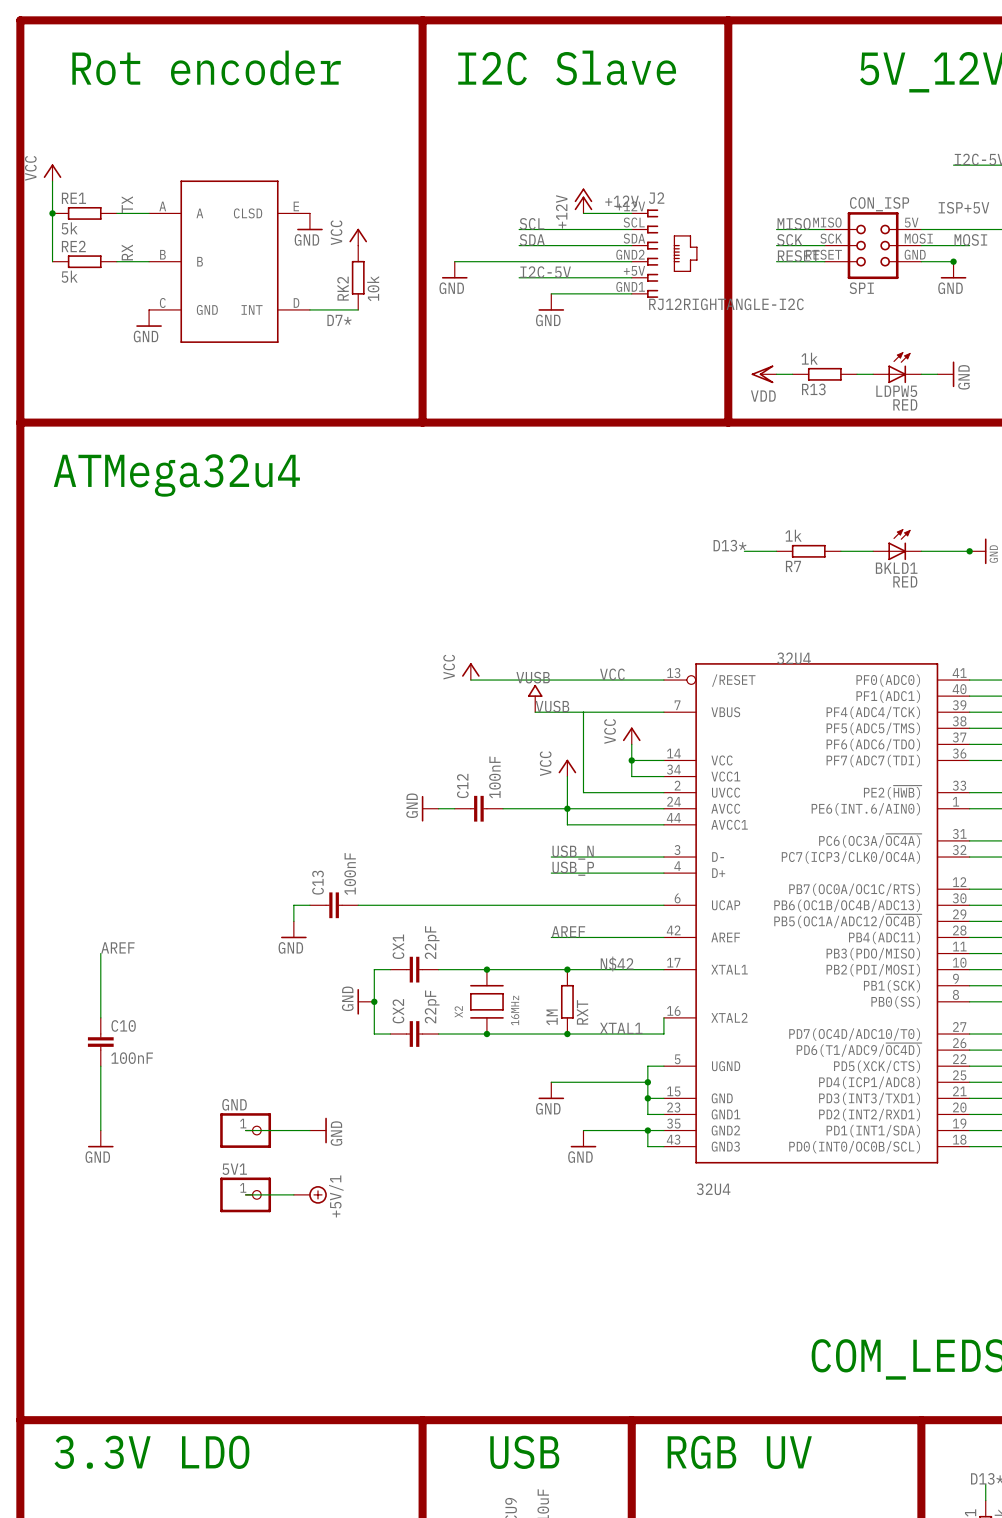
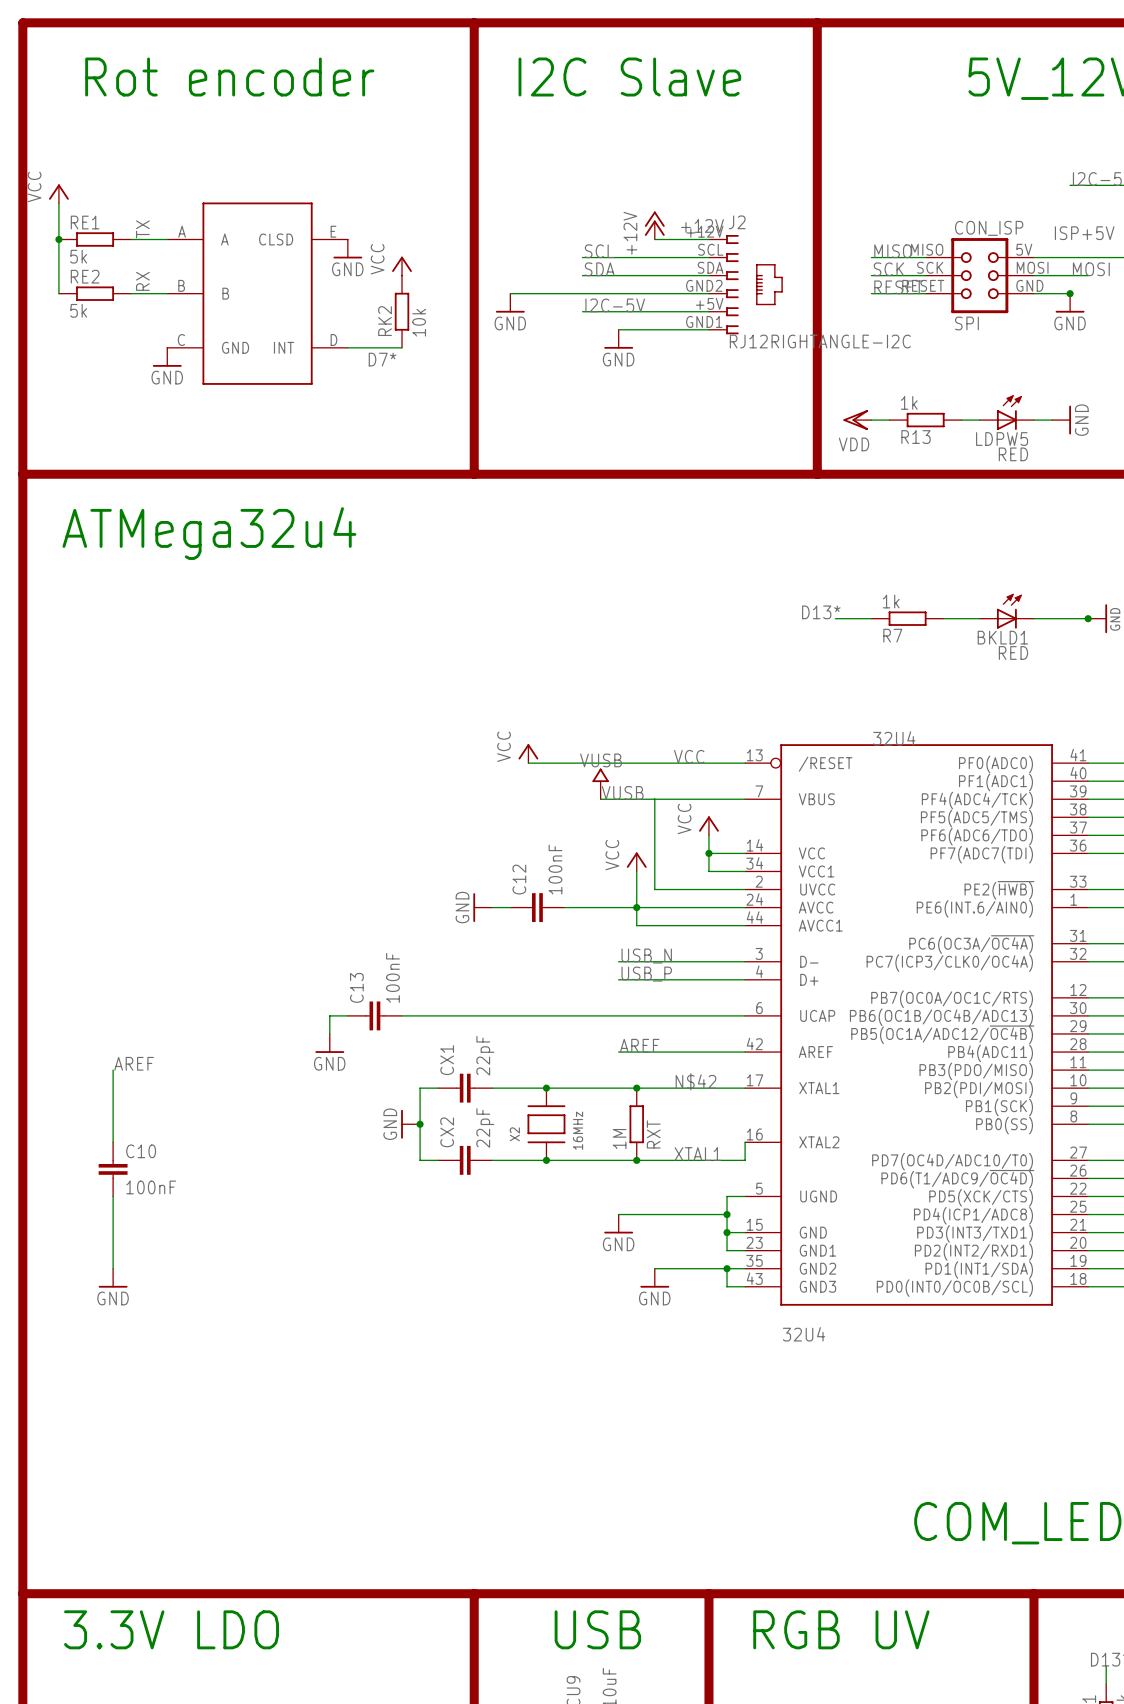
wire: (245, 1130) (309, 1130) -> none
GND: (245, 1130) -> none
power symbol: GND (318, 1130) -> none
wire: (245, 1194) (293, 1194) -> none
5V1: (245, 1194) -> none
power symbol: +5V/1 (310, 1194) -> none

